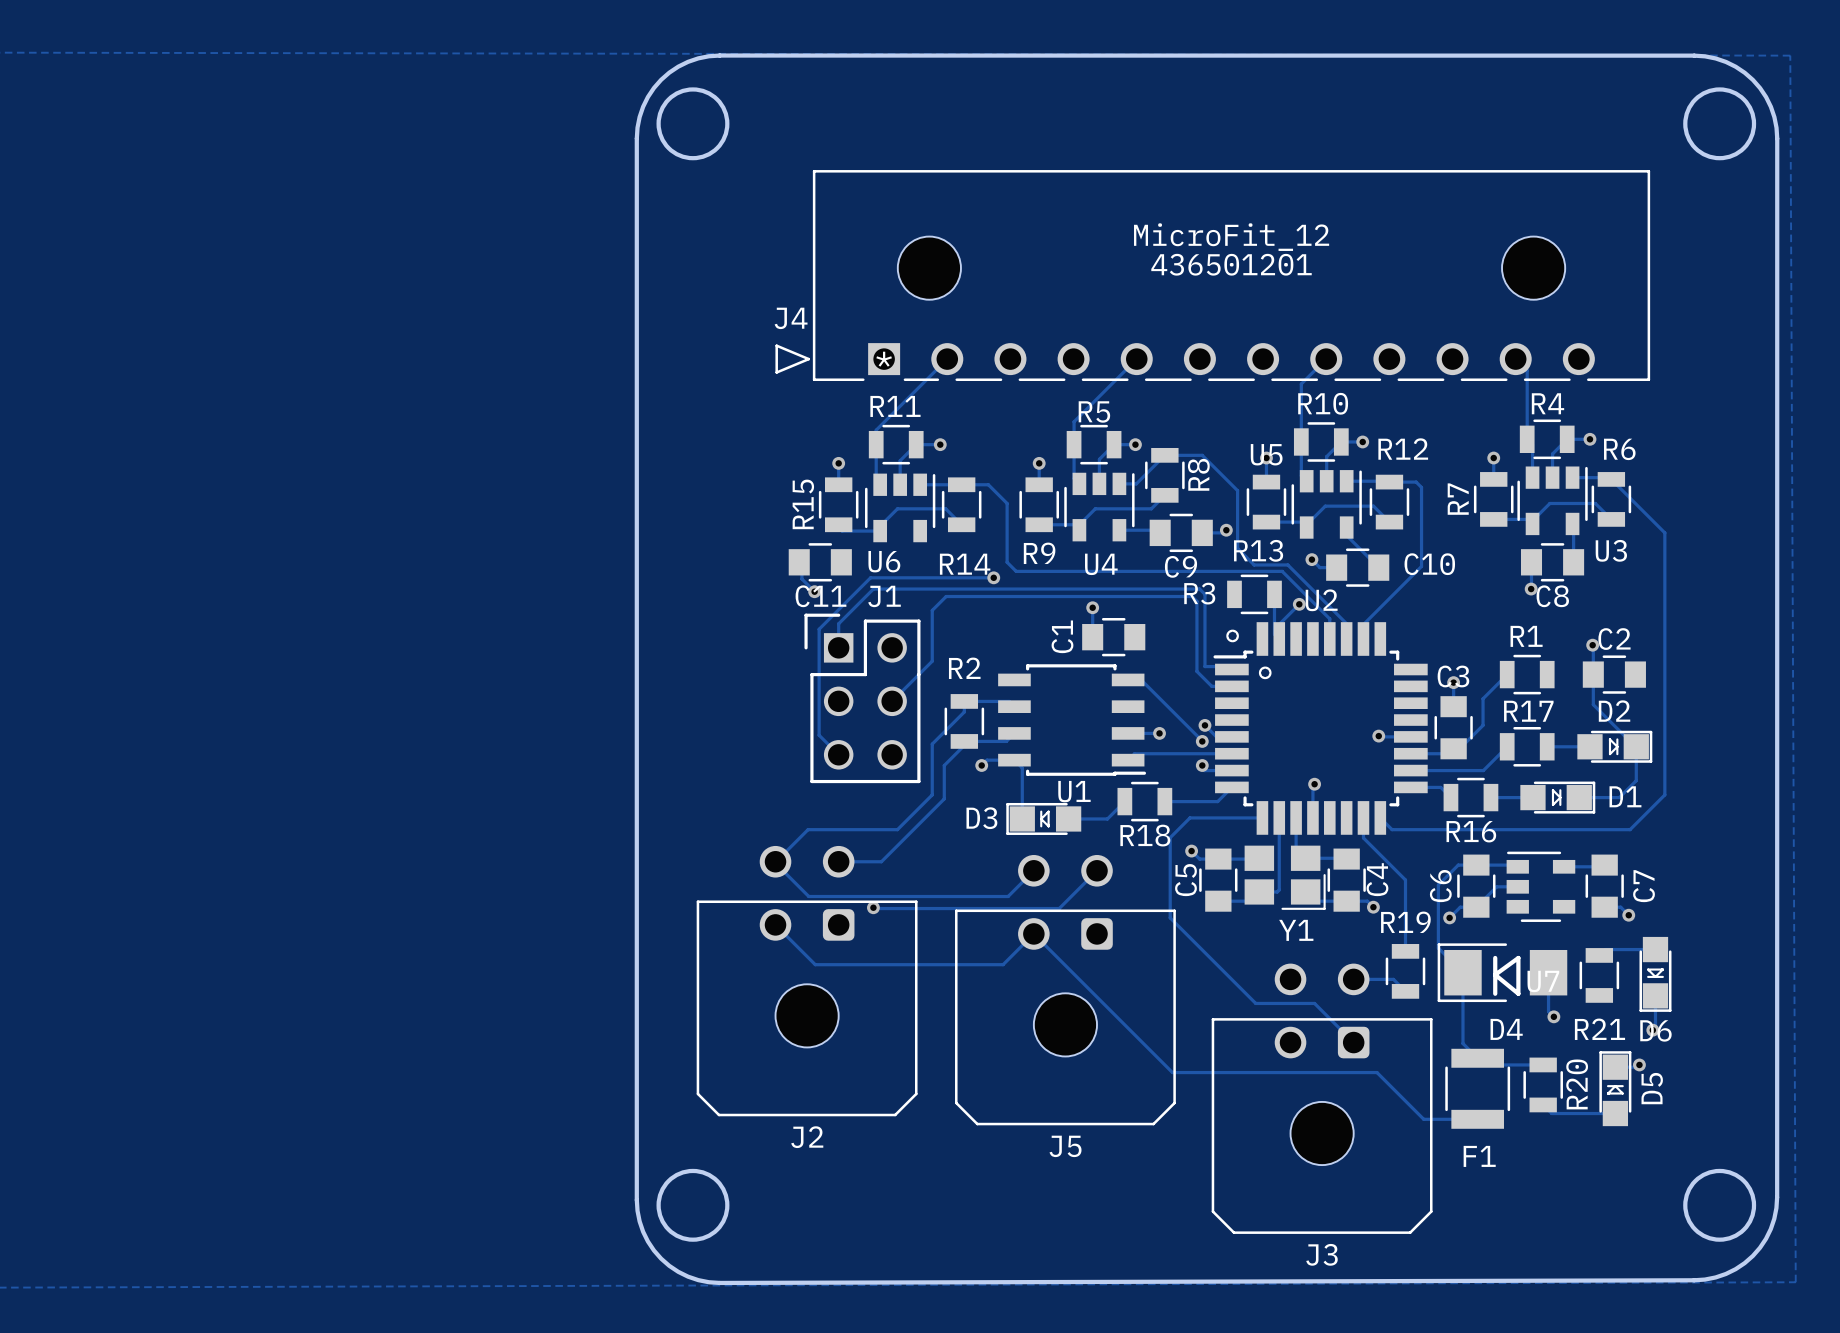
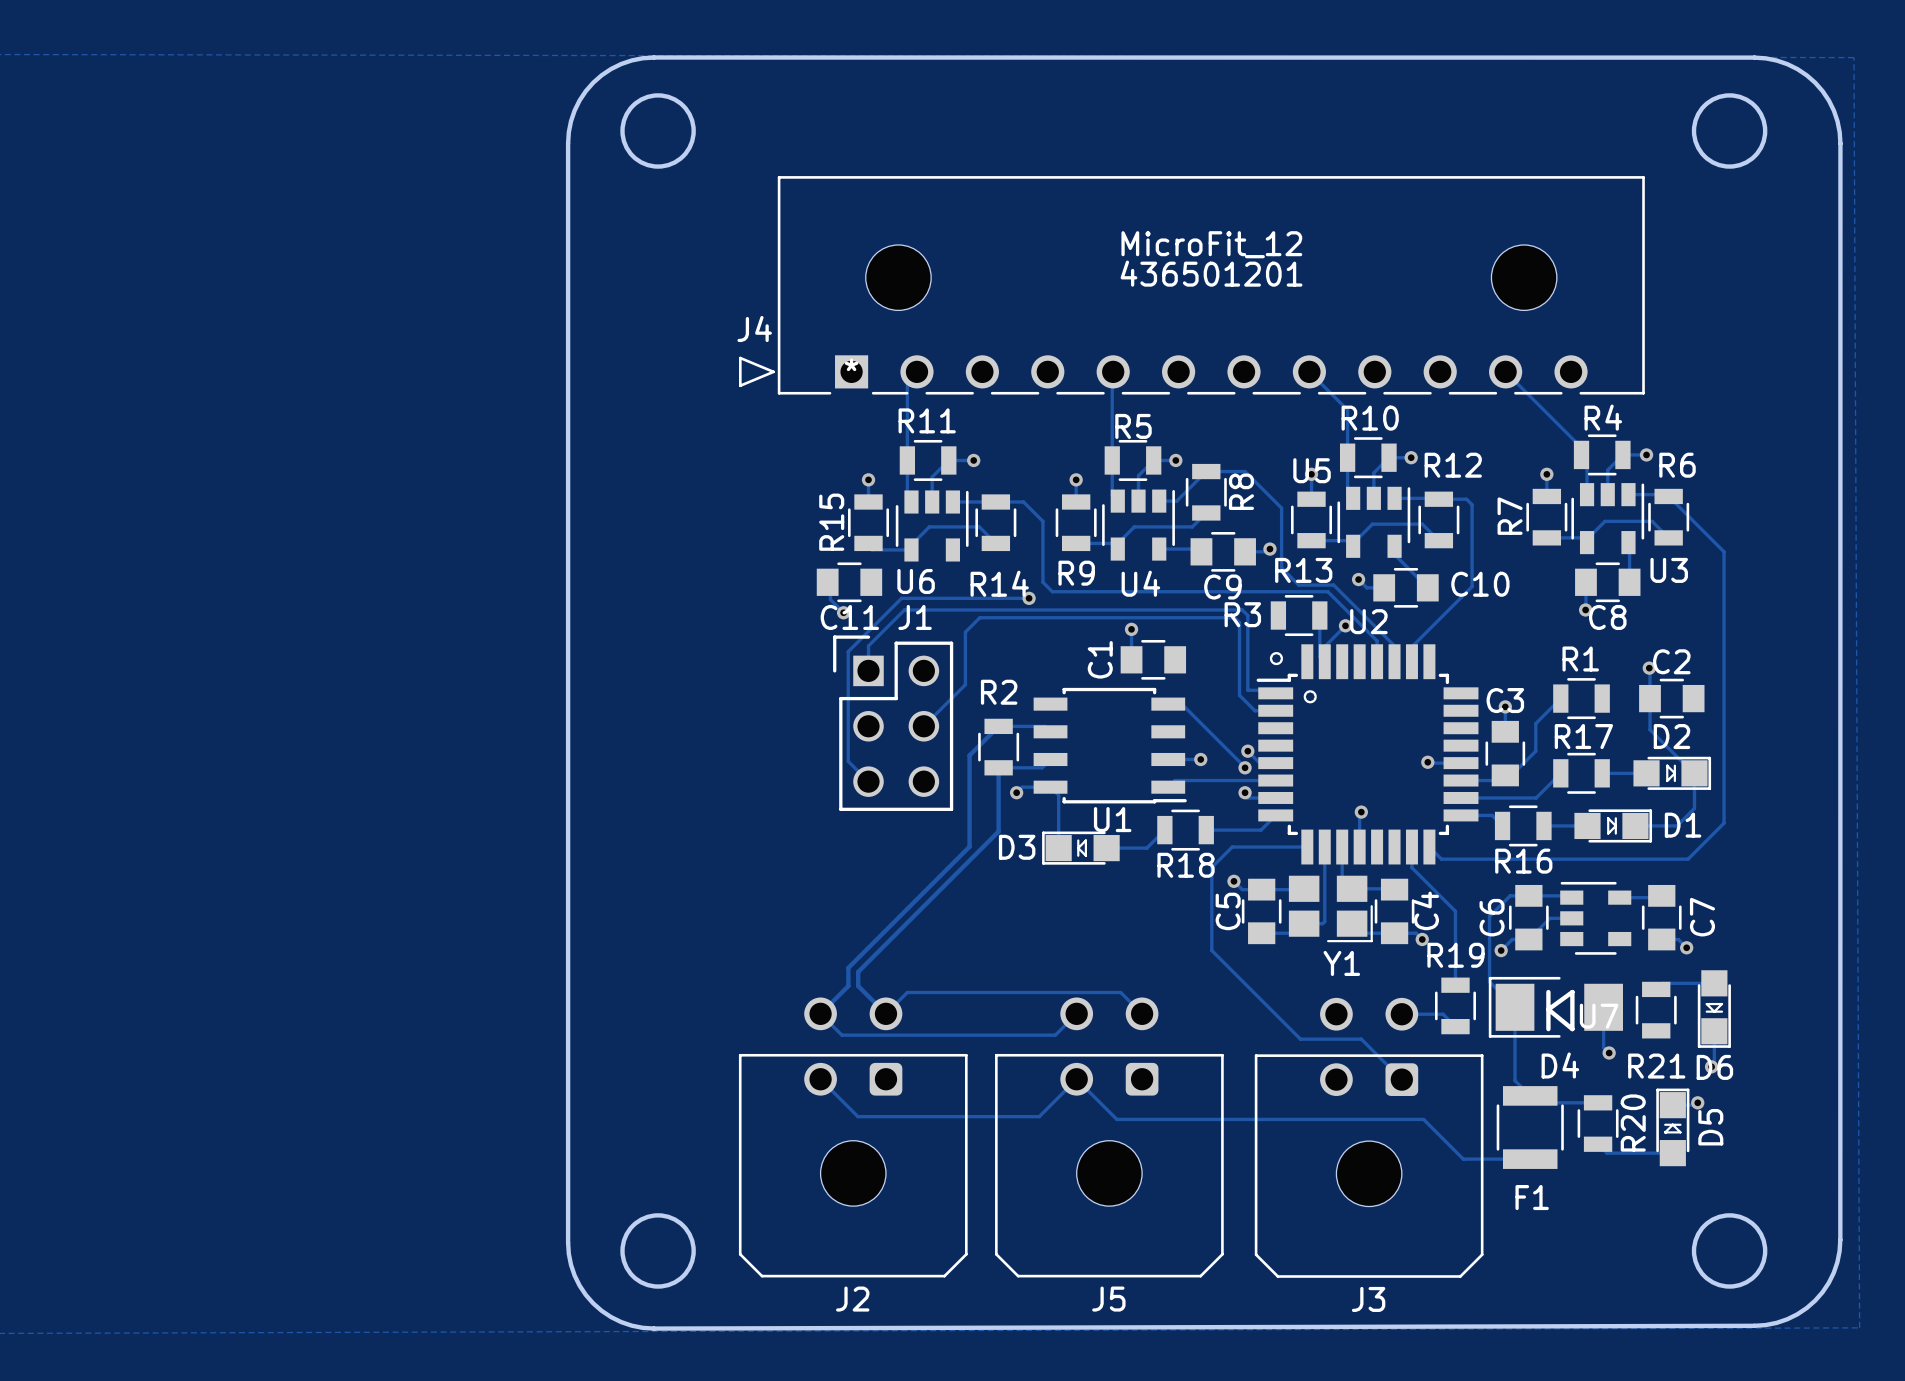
board edge: (1694, 55) (708, 56) (678, 66) (653, 88) (643, 106) (636, 138) (636, 1199) (643, 1231) (661, 1258) (688, 1276) (719, 1282) (1694, 1280) -> (1754, 57) (642, 58) (611, 69) (585, 91) (574, 110) (568, 143) (568, 1242) (574, 1275) (593, 1303) (621, 1322) (654, 1328) (1754, 1325)
round board edge position: (692, 123) -> (658, 130)
round board edge position: (1719, 123) -> (1729, 130)
J4 position: (1212, 275) -> (1191, 285)
track: (947, 359) (876, 430) -> (916, 371) (907, 381) (907, 445)
track: (1136, 359) (1074, 421) -> (1113, 371) (1112, 436)
track: (1326, 359) (1301, 384) (1301, 395) -> (1309, 371) (1347, 410)
track: (1515, 359) (1527, 370) (1527, 432) -> (1505, 371) (1581, 447)
track: (964, 701) (964, 712) (932, 744) (932, 794) (897, 829) (808, 829) (775, 862) (808, 896) (1008, 896) (1033, 870) -> (998, 726) (969, 755) (969, 846) (848, 967) (848, 986) (820, 1013) (841, 1035) (1055, 1035) (1076, 1013)
track: (964, 745) (944, 765) (944, 798) (881, 861) (838, 861) -> (998, 771) (998, 831) (858, 971) (858, 986) (885, 1013) (907, 992) (1120, 992) (1142, 1013)
track: (1097, 870) (1059, 908) (873, 907) -> none
via: (873, 907) -> none
track: (775, 924) (815, 964) (1003, 964) (1033, 933) (1172, 1072) (1377, 1072) (1423, 1119) -> (820, 1079) (857, 1116) (1039, 1116) (1076, 1079) (1116, 1119) (1423, 1119) (1463, 1159) (1474, 1159)
J2 position: (807, 981) -> (853, 1137)
J5 position: (1065, 990) -> (1109, 1137)
round board edge position: (692, 1205) -> (658, 1250)
round board edge position: (1719, 1205) -> (1729, 1250)

